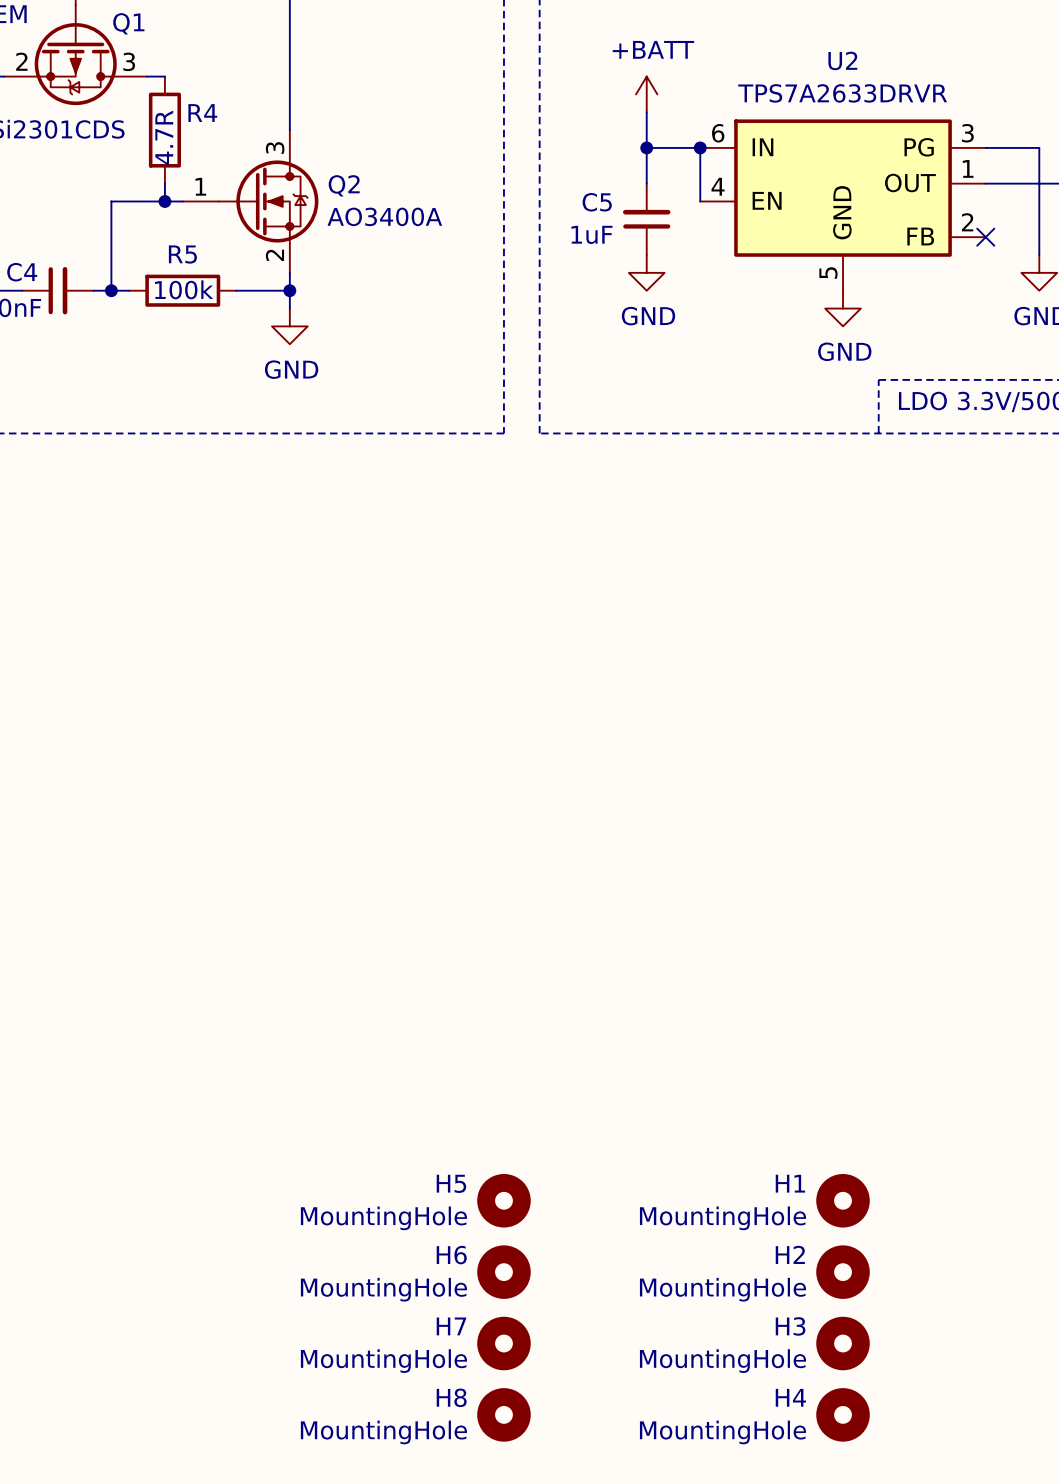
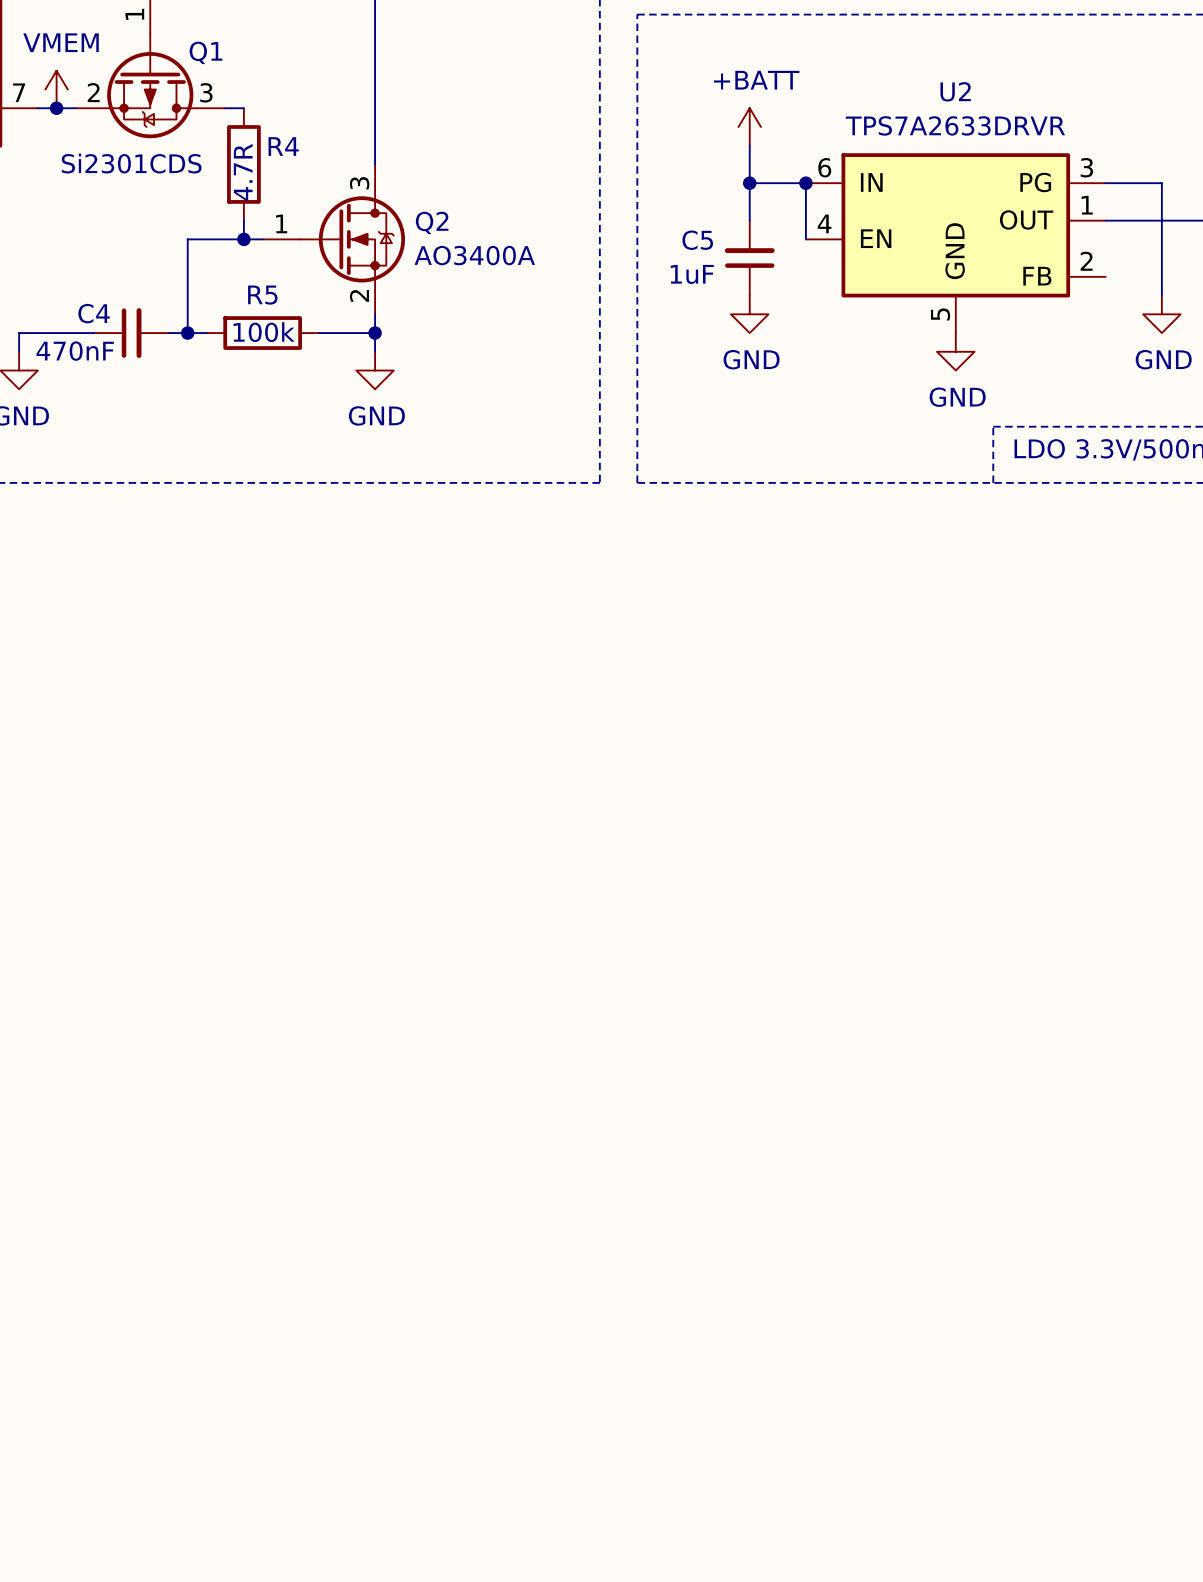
no-connect mark: (985, 237) -> none
H5: MountingHole (503, 1200) -> none
H1: MountingHole (843, 1200) -> none
H6: MountingHole (503, 1272) -> none
H2: MountingHole (843, 1272) -> none
H7: MountingHole (503, 1343) -> none
H3: MountingHole (843, 1343) -> none
H8: MountingHole (503, 1414) -> none
H4: MountingHole (843, 1414) -> none

